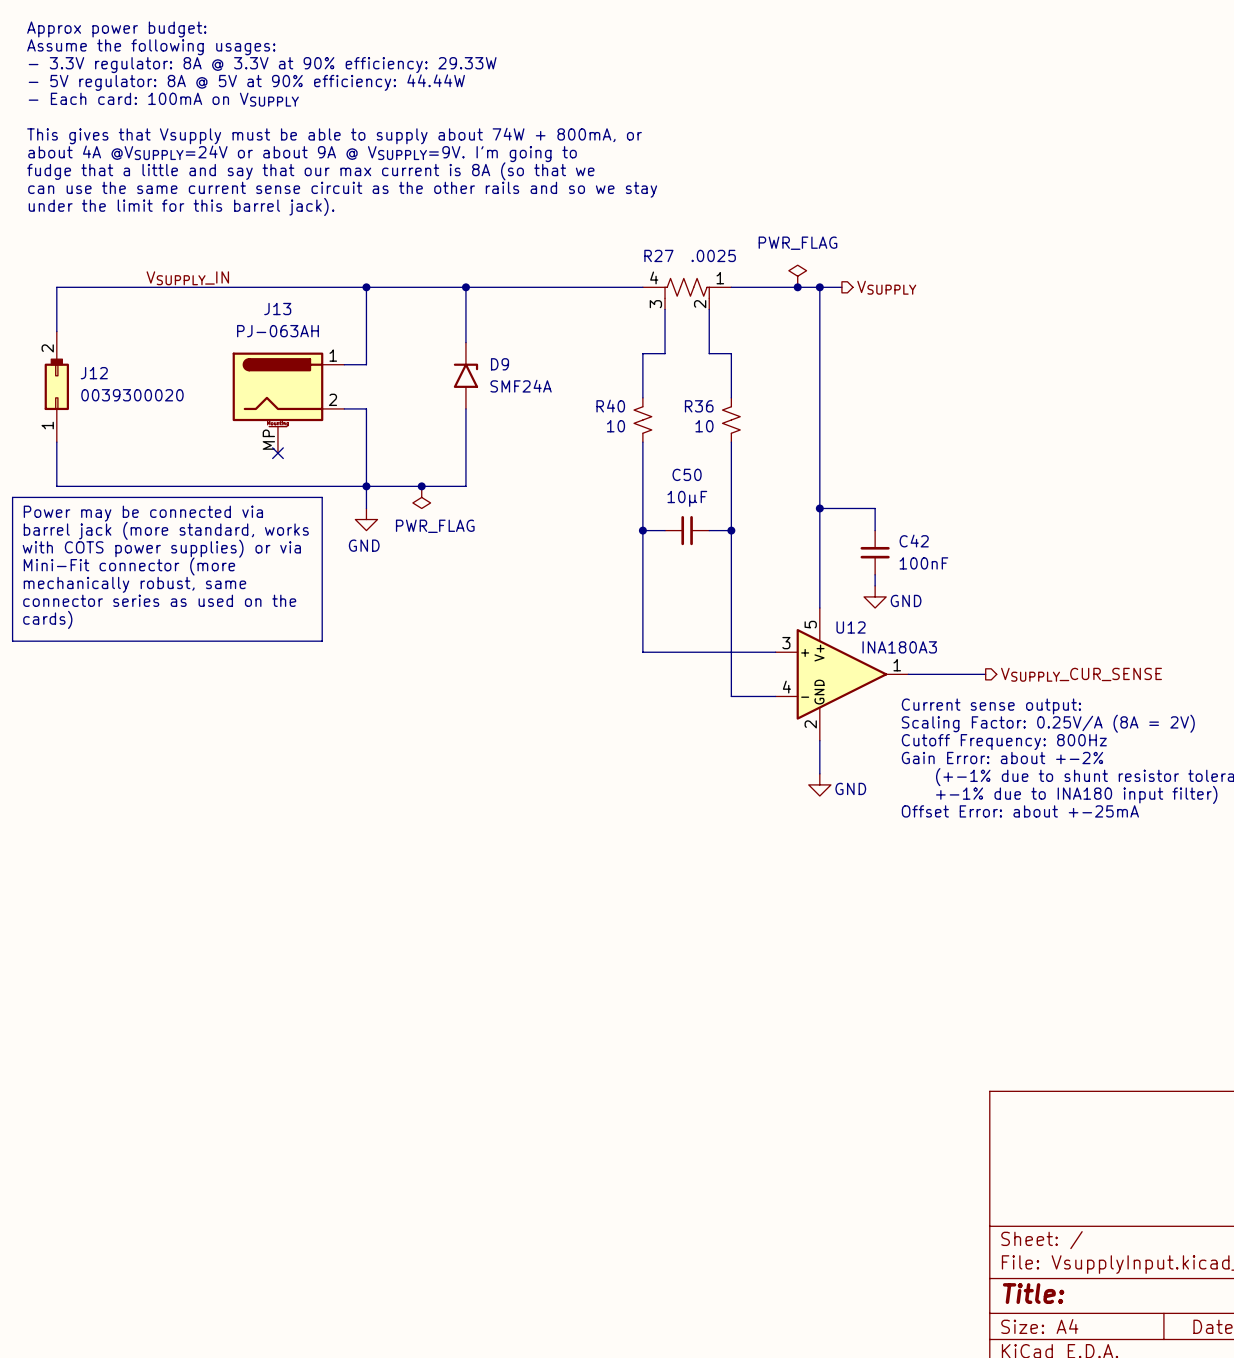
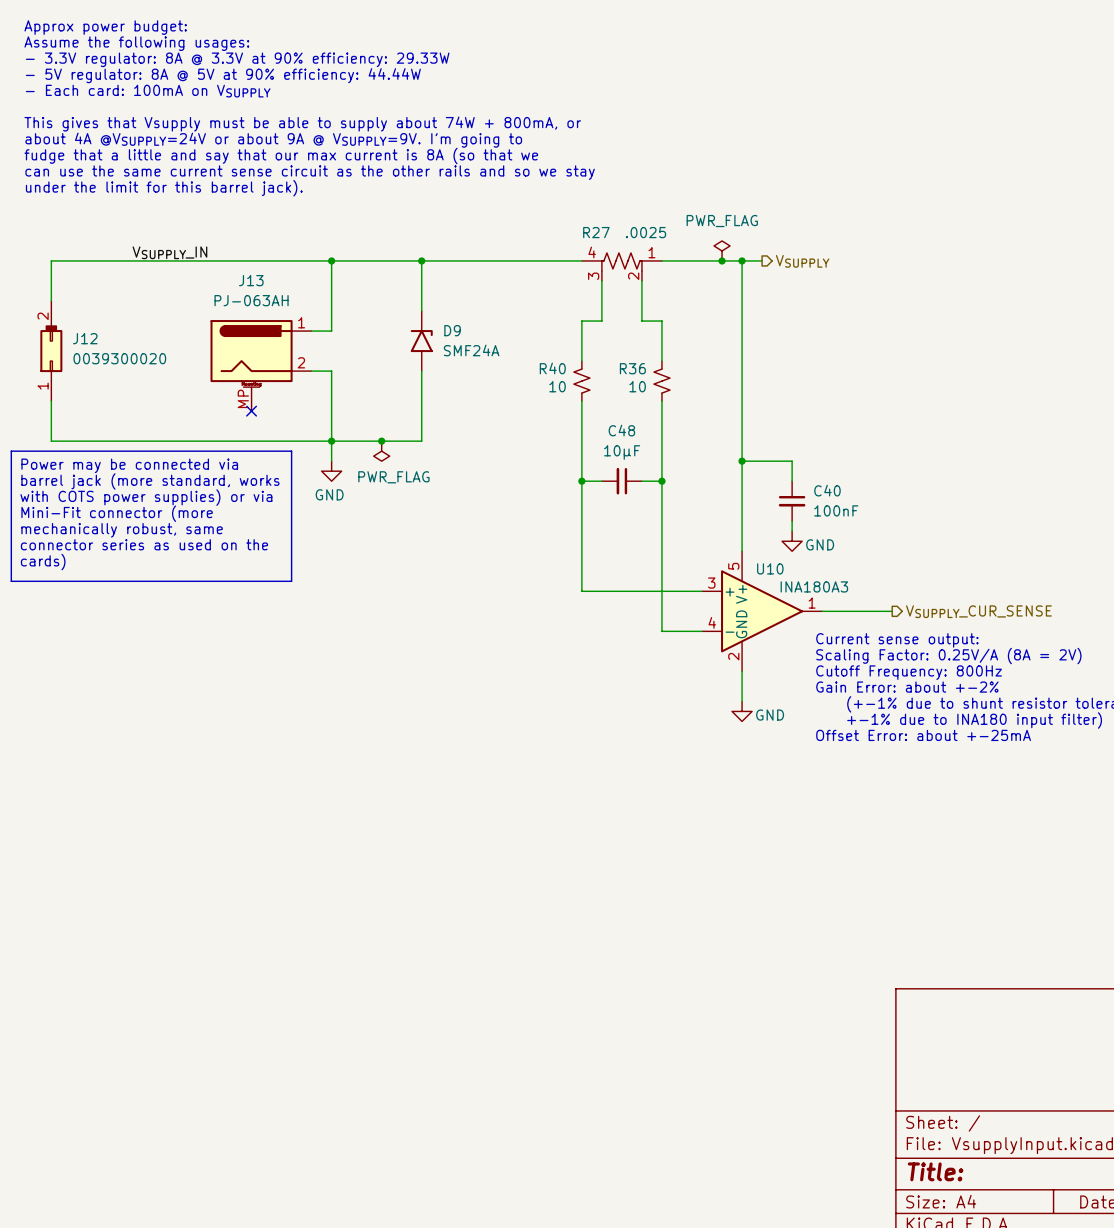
C50: 10µF (687, 530) -> none
C48: none -> 10µF (621, 481)
C42: 100nF (875, 552) -> none
C40: none -> 100nF (792, 501)
U12 symbol: [775, 608, 909, 741] -> [702, 551, 823, 672]
U12 name: U12 (851, 627) -> U10 (770, 568)

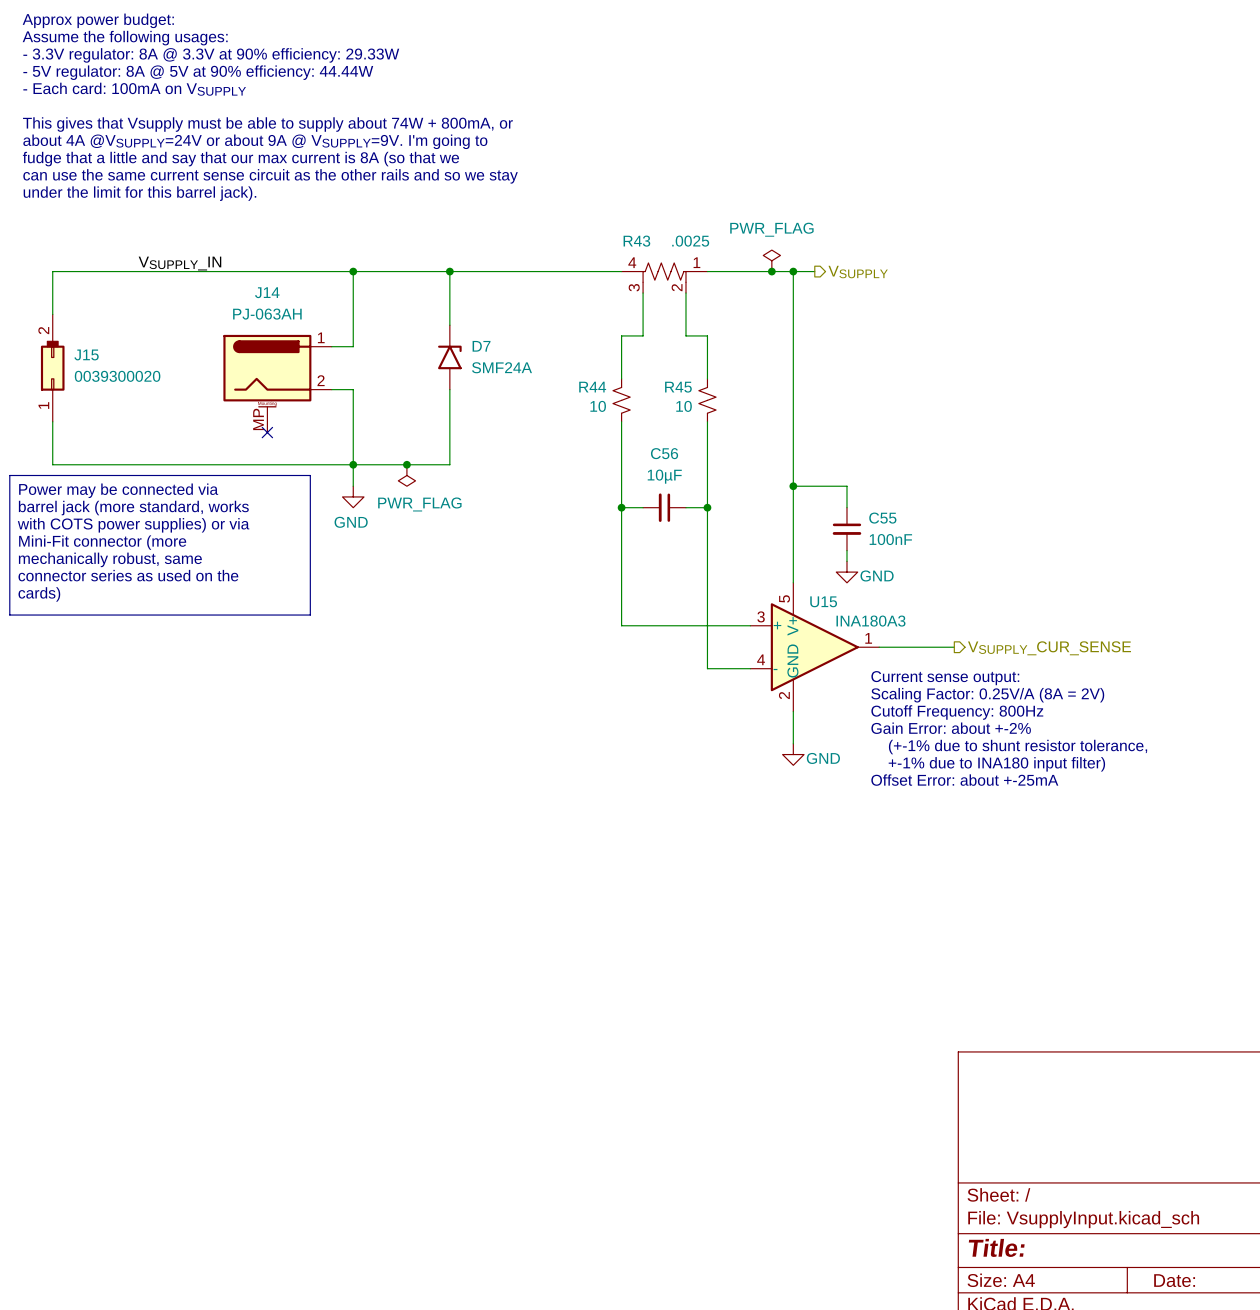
R27 name: R27 (596, 232) -> R43 (636, 241)
J13 name: J13 (251, 280) -> J14 (267, 292)
D9 name: D9 (452, 330) -> D7 (481, 346)
J12 name: J12 (85, 338) -> J15 (86, 354)
R40 name: R40 (552, 368) -> R44 (592, 387)
R36 name: R36 (632, 368) -> R45 (678, 387)
C48 name: C48 (621, 430) -> C56 (664, 453)
C40 name: C40 (827, 490) -> C55 (882, 518)
U10 name: U10 (770, 568) -> U15 (823, 601)

